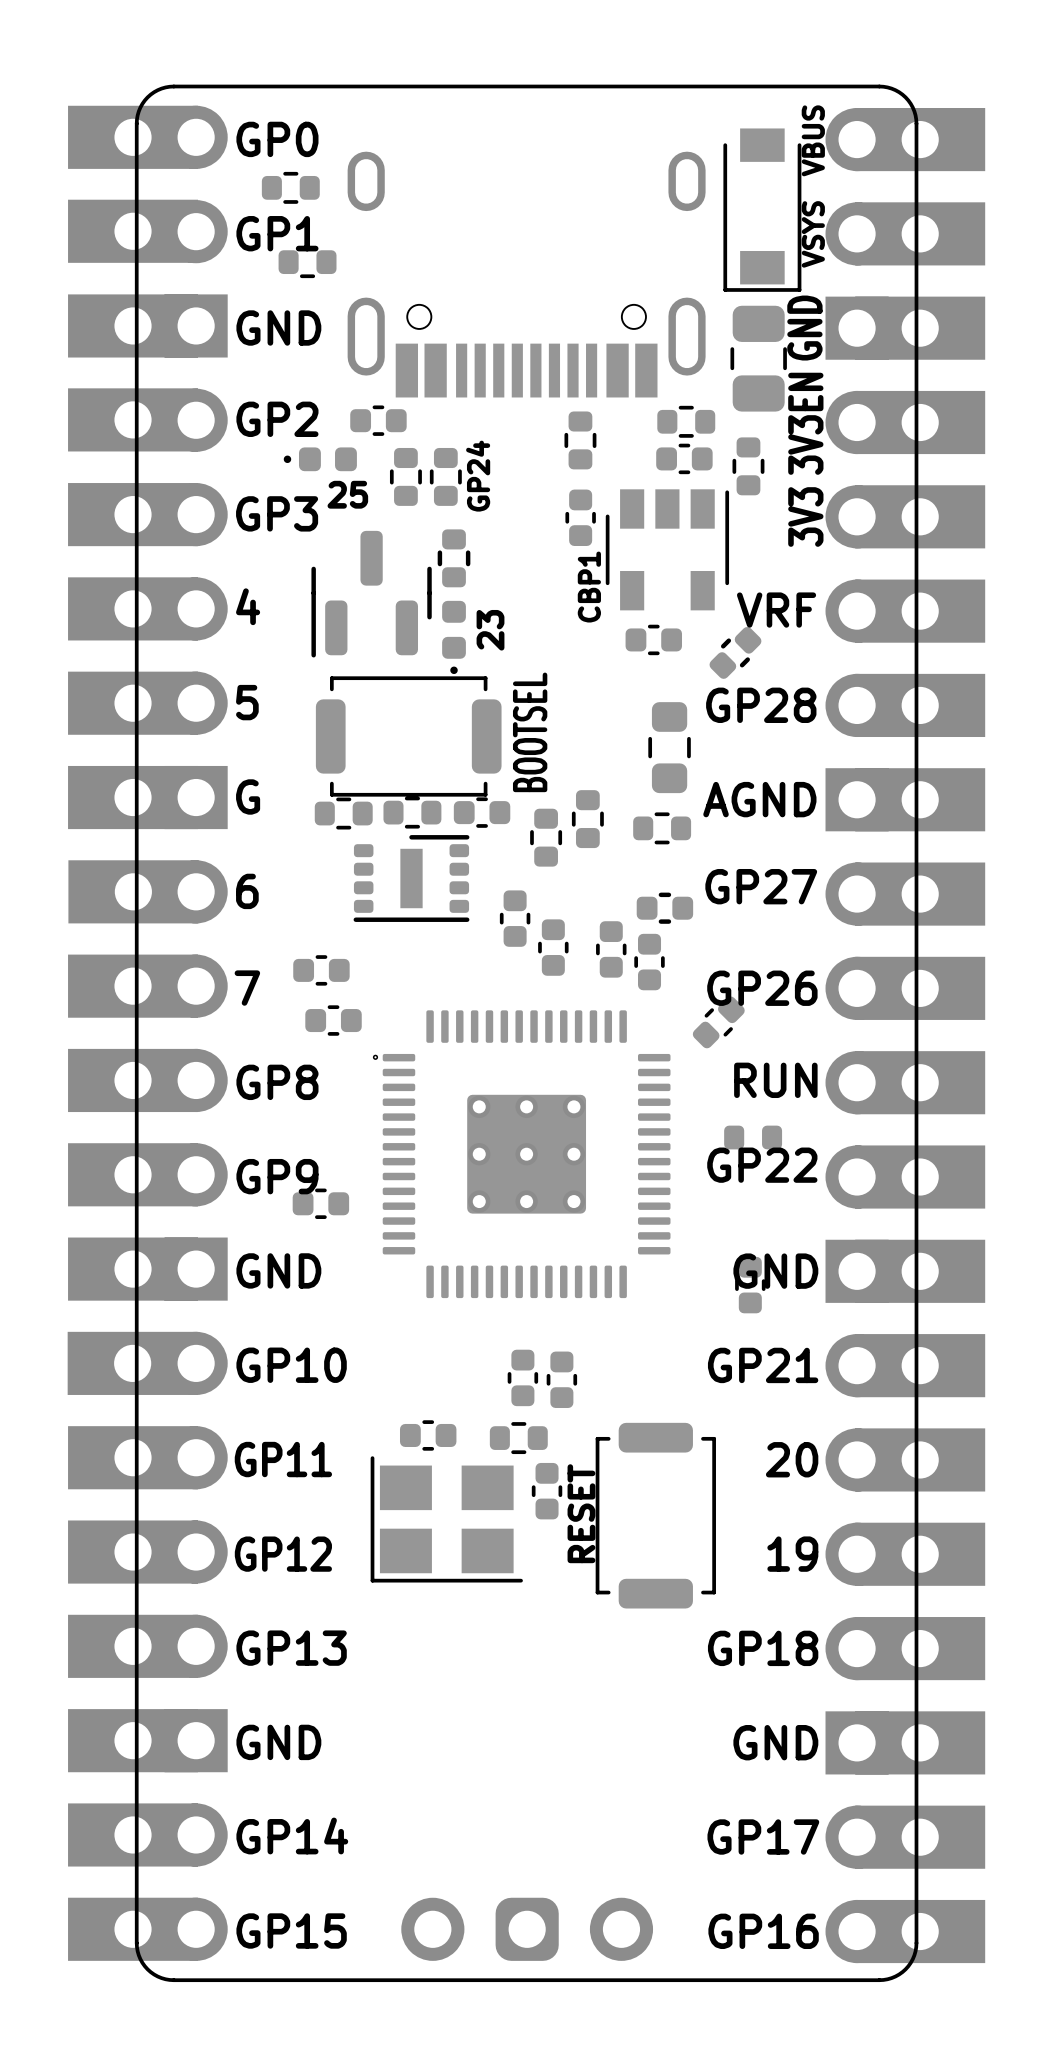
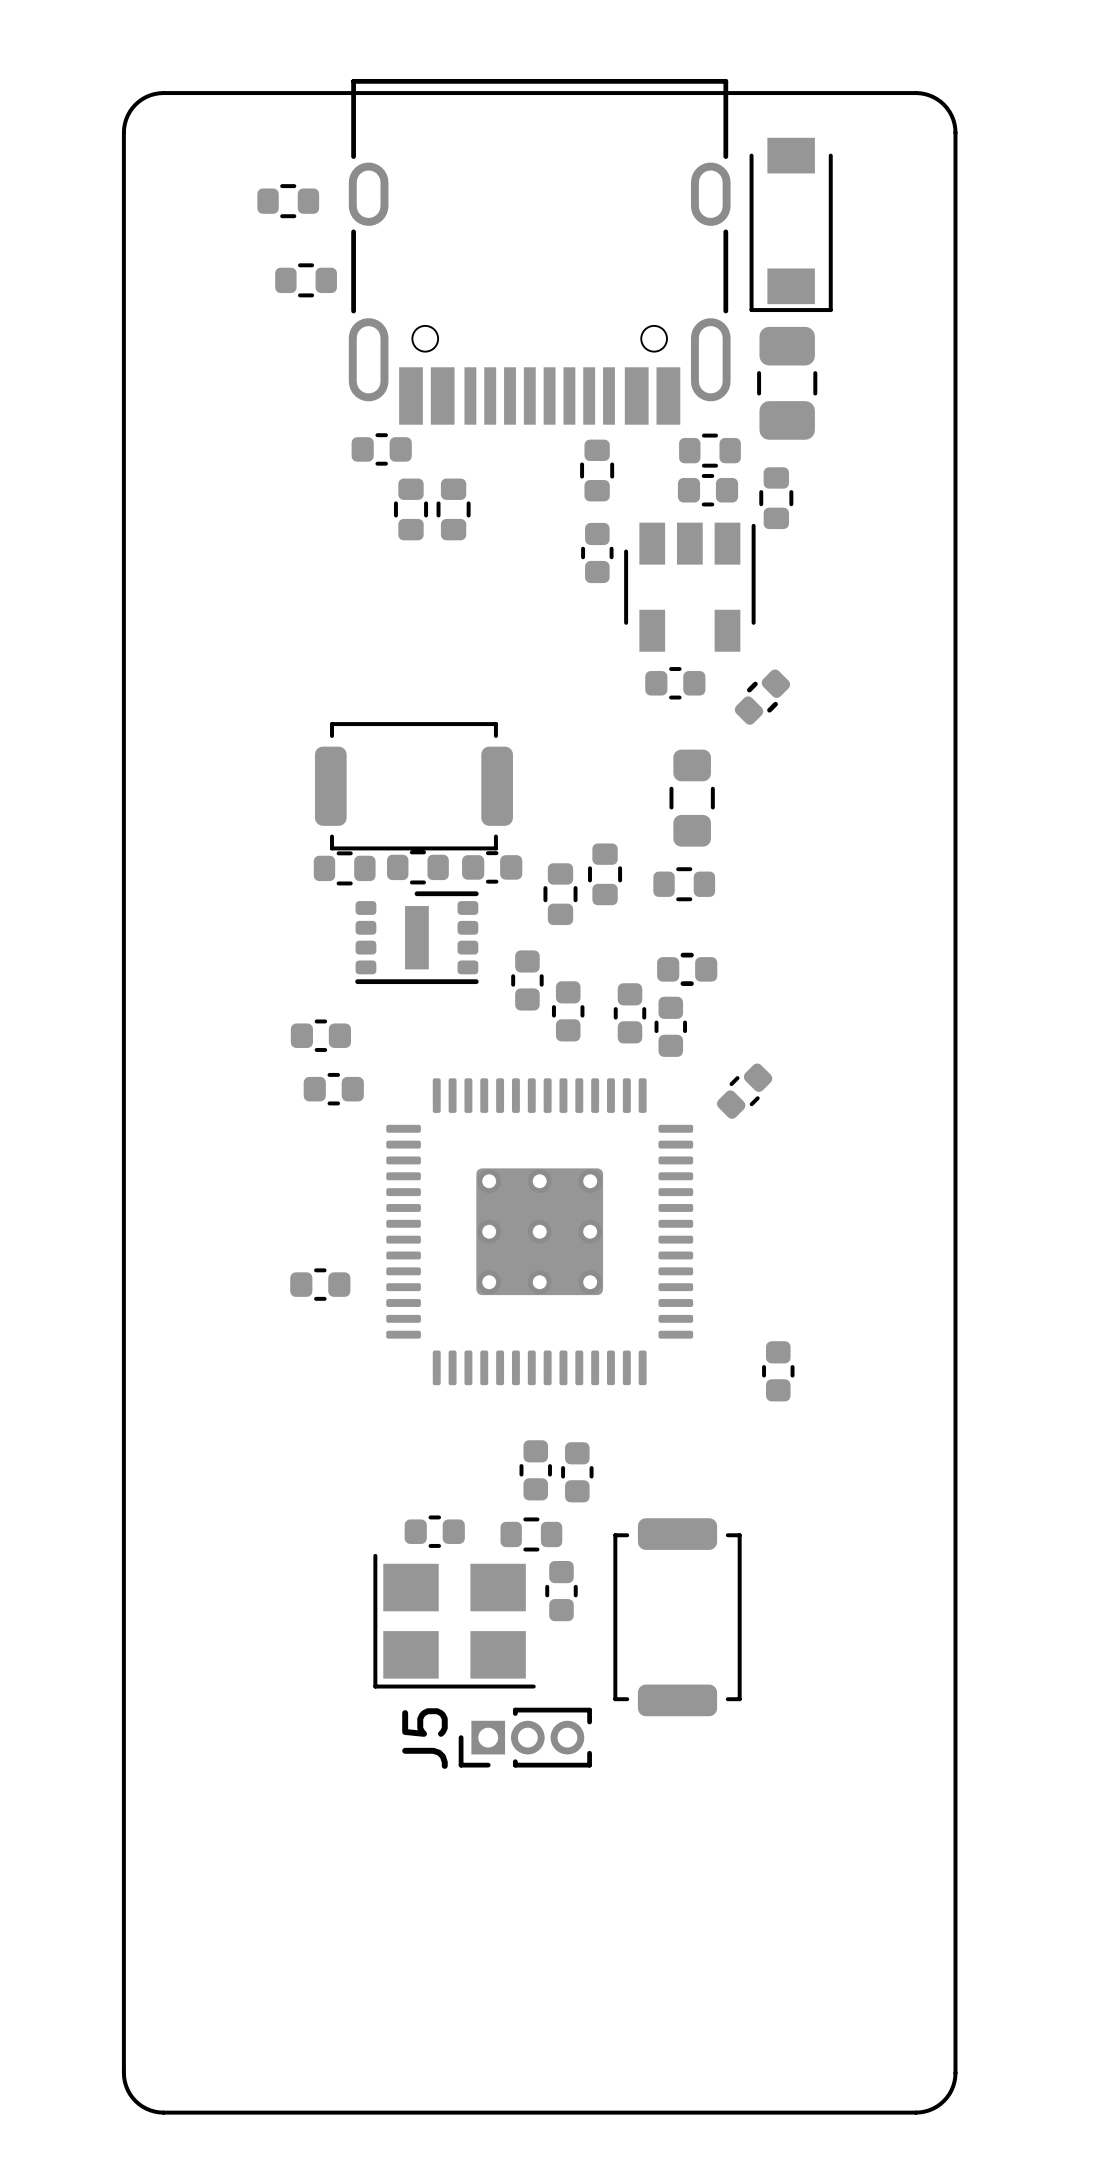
text: GP0 (277, 139) -> none
text: VBUS (813, 140) -> none
text: GP1 (277, 233) -> none
text: VSYS (813, 234) -> none
part: none -> (539, 251)
part: (526, 274) -> none
text: GND (278, 328) -> none
text: GND (804, 328) -> none
text: GP2 (277, 419) -> none
text: 3V3EN (805, 423) -> none
part: (320, 459) -> none
text: GP24 (478, 476) -> none
text: 25 (347, 494) -> none
text: GP3 (277, 513) -> none
text: 3V3 (805, 517) -> none
part: (454, 558) -> none
text: CBP1 (589, 587) -> none
part: (371, 594) -> none
text: 4 (248, 606) -> none
text: VRF (776, 610) -> none
text: 23 (490, 630) -> none
part: (454, 637) -> none
text: 5 (247, 702) -> none
text: GP28 (761, 705) -> none
text: BOOTSEL (530, 732) -> none
text: G (248, 796) -> none
text: AGND (759, 799) -> none
text: GP27 (761, 886) -> none
text: 6 (247, 891) -> none
text: 7 (247, 988) -> none
text: GP26 (762, 988) -> none
part: (147, 1033) -> none
part: (905, 1035) -> none
drawing: [372, 1054, 379, 1060] -> none
text: RUN (775, 1080) -> none
text: GP8 (277, 1082) -> none
part: (753, 1137) -> none
text: GP22 (762, 1165) -> none
text: GP9 (277, 1176) -> none
text: GND (278, 1270) -> none
text: GND (775, 1271) -> none
text: GP10 (291, 1365) -> none
text: GP21 (763, 1365) -> none
text: GP11 (283, 1459) -> none
text: 20 (792, 1459) -> none
text: RESET (581, 1513) -> none
text: GP12 (283, 1554) -> none
text: 19 (792, 1554) -> none
J5: none -> (525, 1737)
text: GP13 (291, 1648) -> none
text: GP18 (763, 1648) -> none
text: GND (278, 1742) -> none
text: GND (775, 1742) -> none
text: GP14 (292, 1835) -> none
text: GP17 (763, 1837) -> none
part: (527, 1929) -> none
text: GP15 (291, 1931) -> none
text: GP16 (763, 1931) -> none

